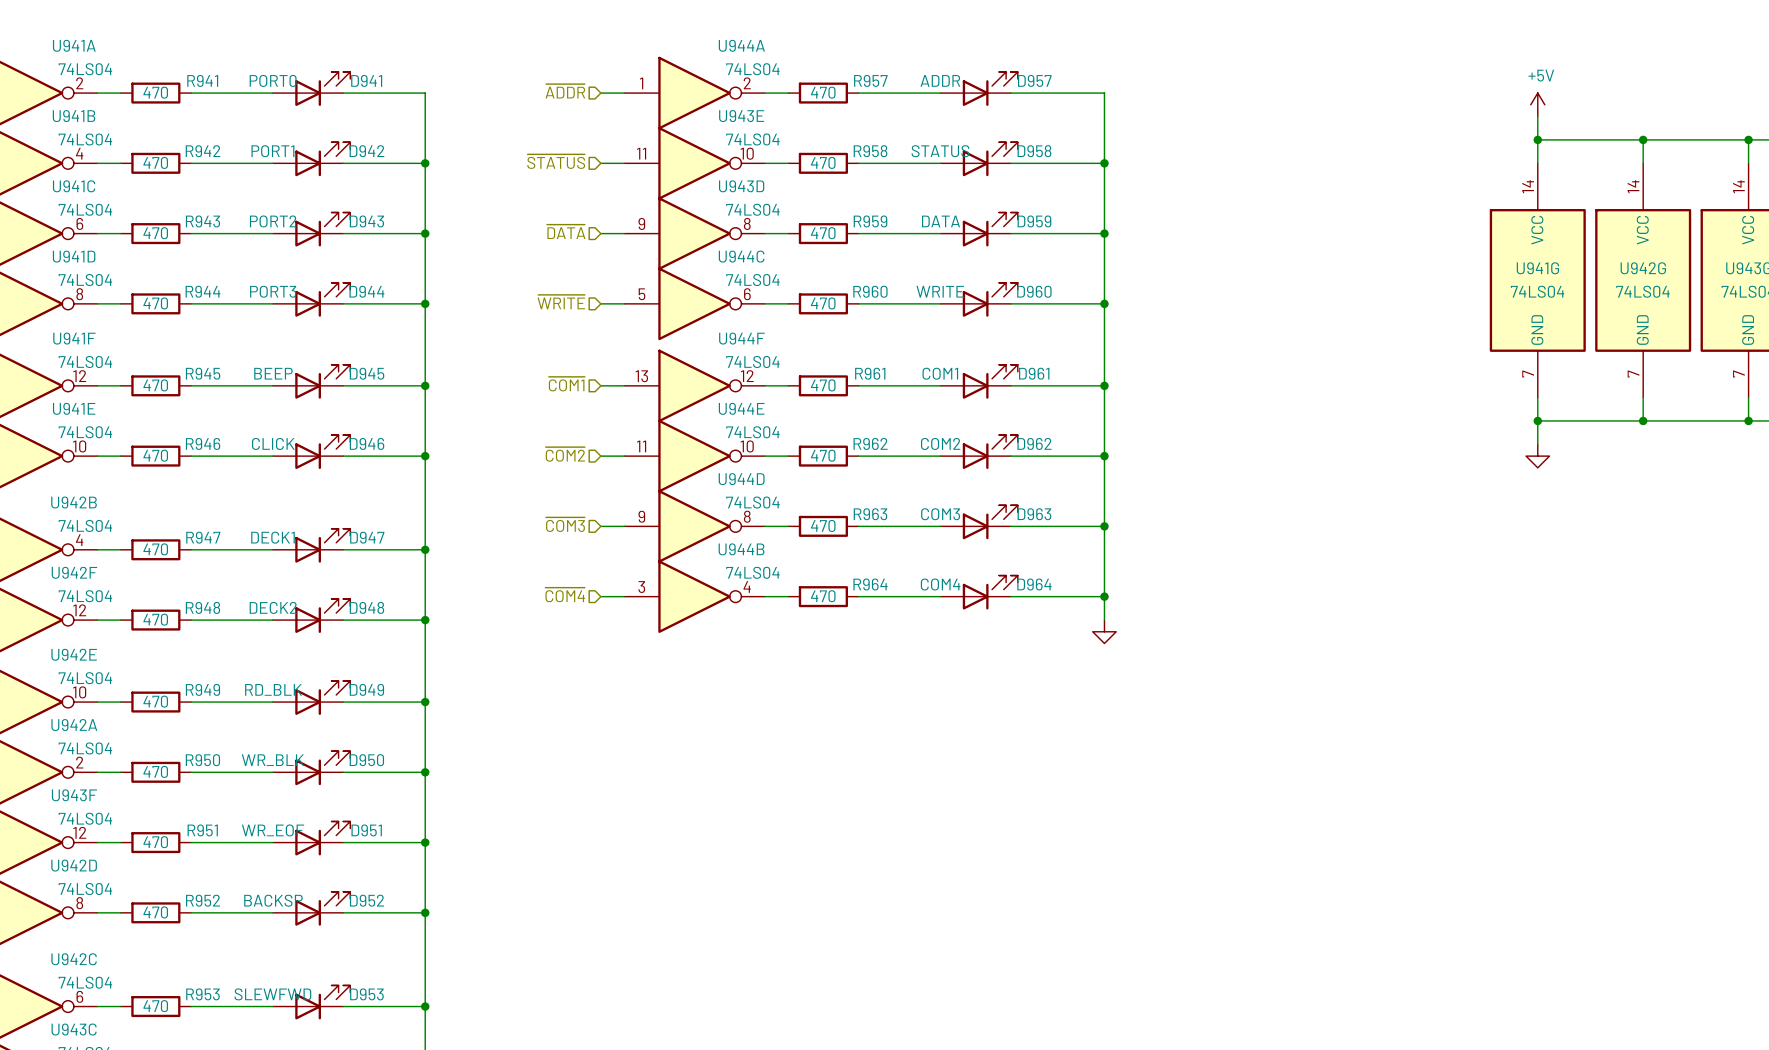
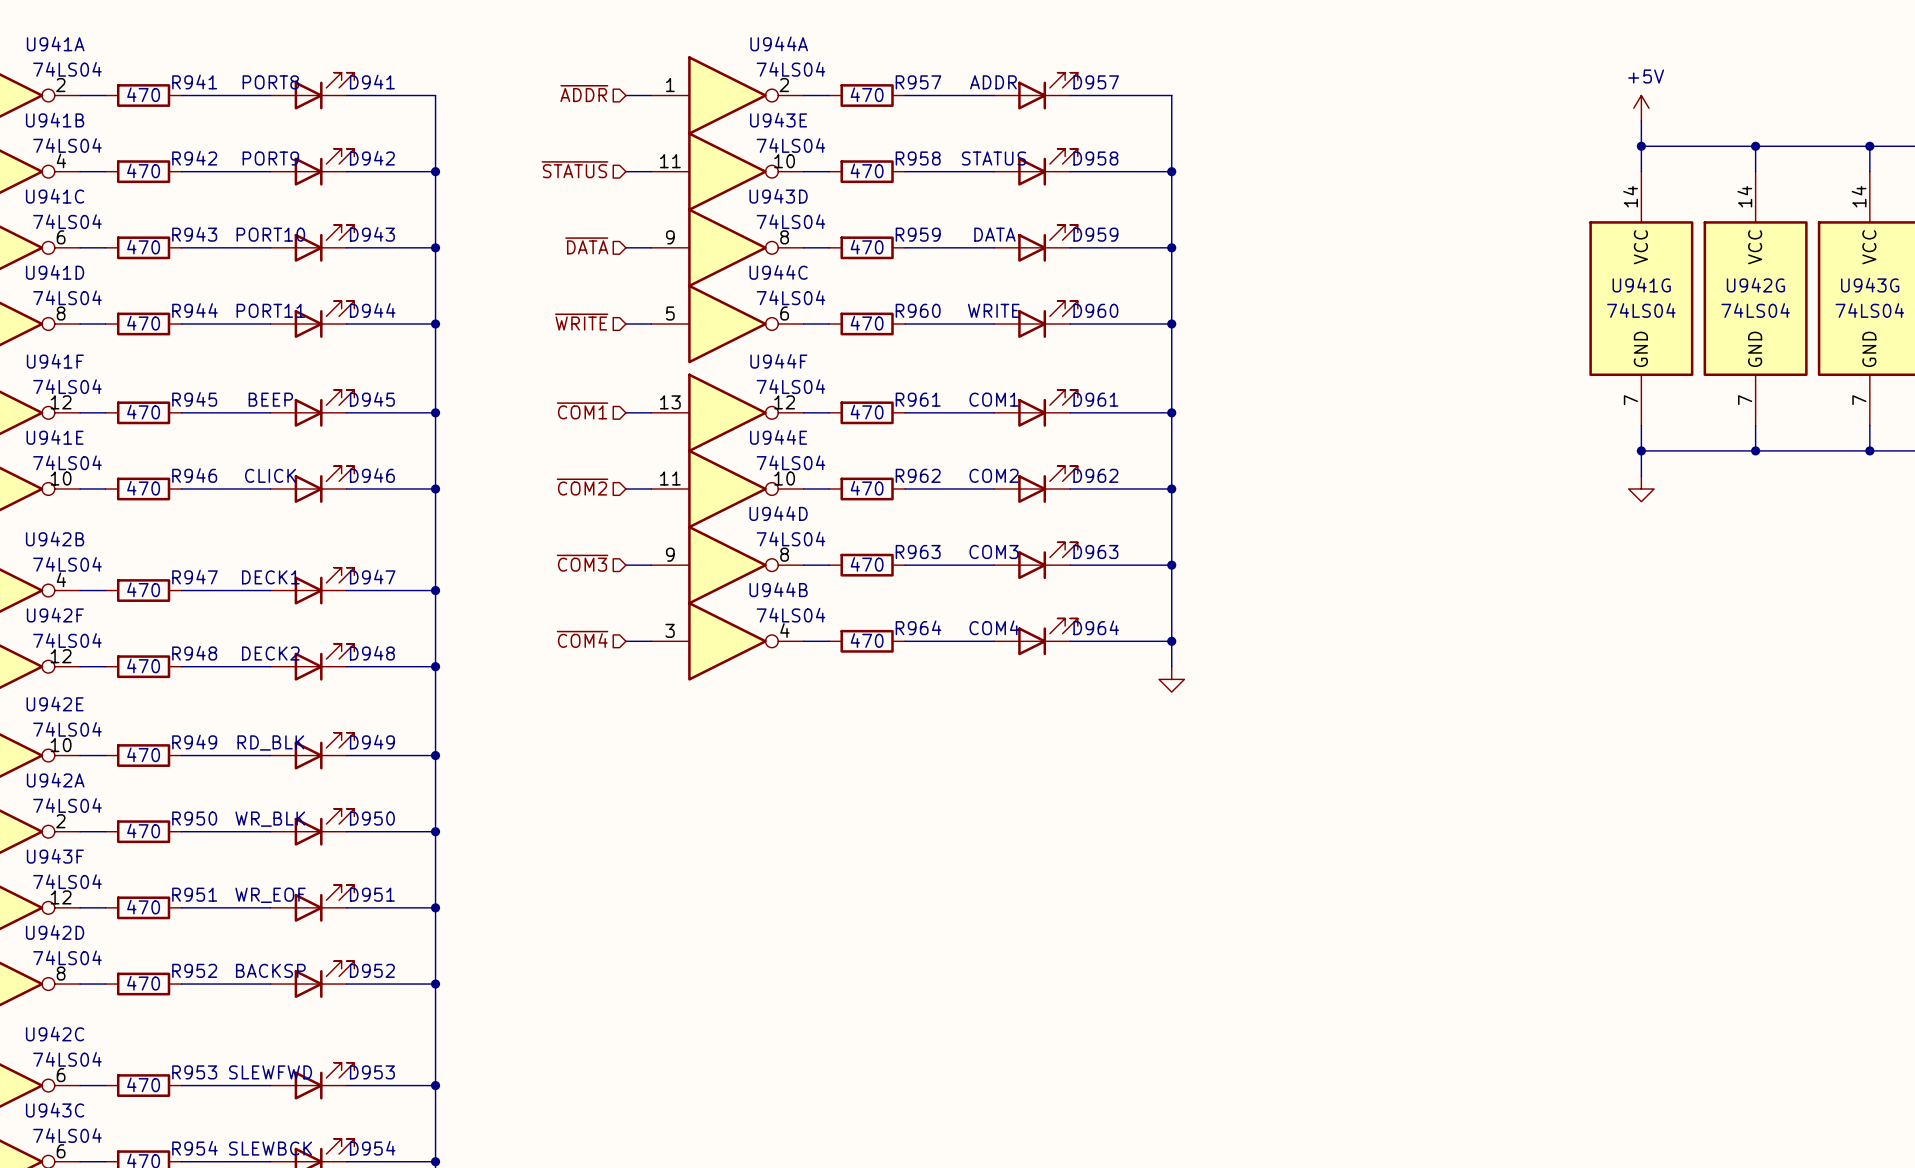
D941 value: PORT0 (273, 80) -> PORT8 (270, 82)
D942 value: PORT1 (272, 151) -> PORT9 (270, 158)
D943 value: PORT2 (273, 221) -> PORT10 (270, 234)
D944 value: PORT3 (273, 291) -> PORT11 (270, 310)

